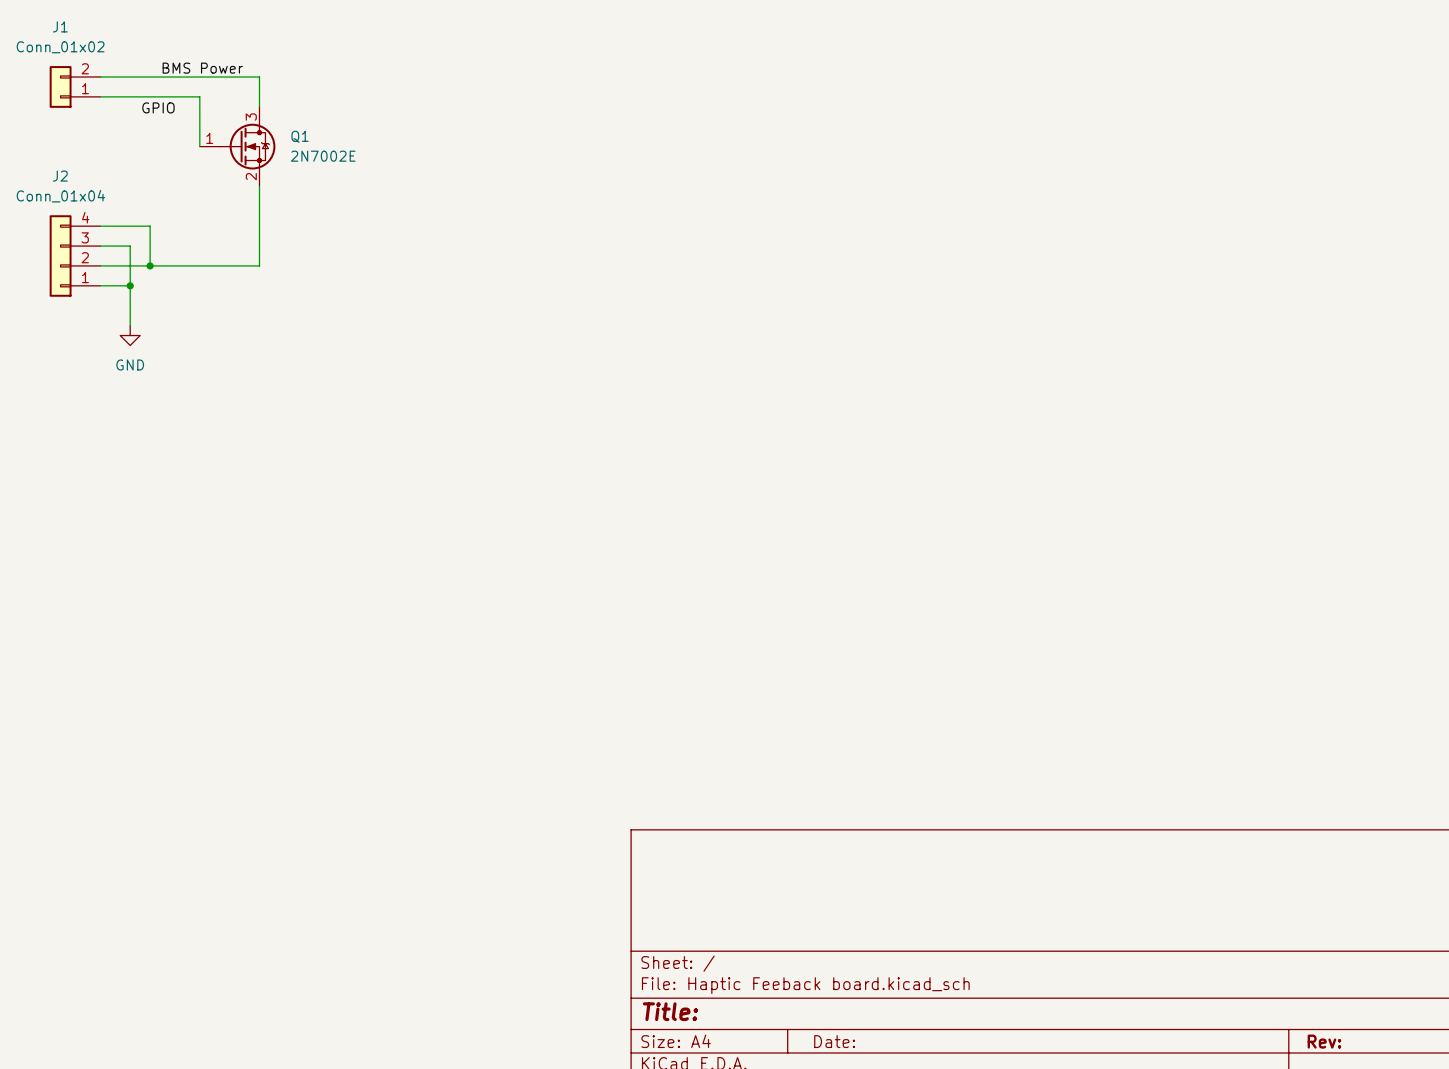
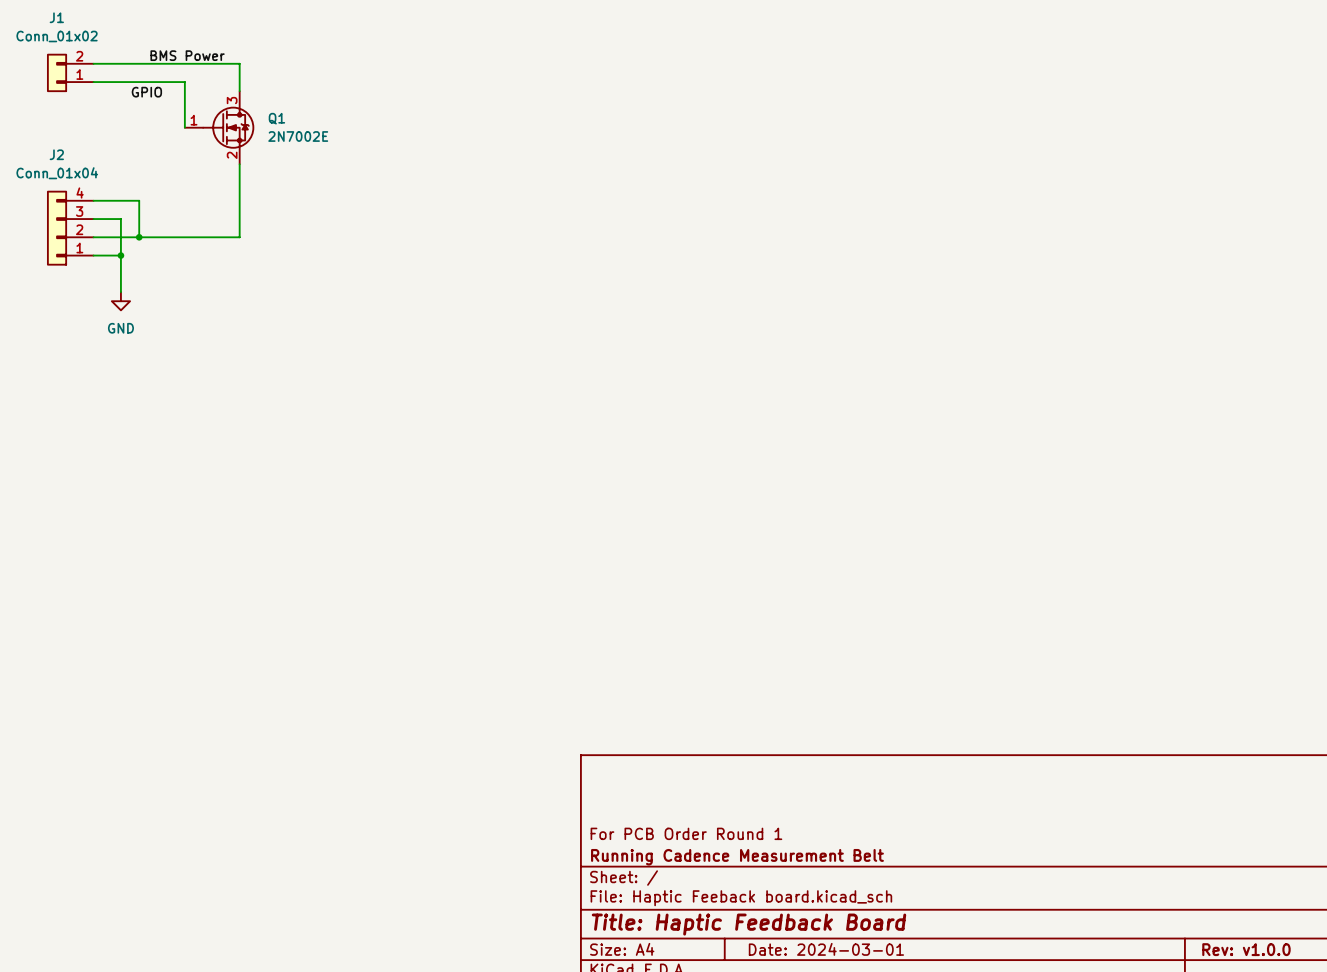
title block: none -> For PCB Order Round 1 (686, 833)
title block: none -> Running Cadence Measurement Belt (737, 857)
title block: Title: (670, 1011) -> Title: Haptic Feedback Board (748, 924)
title block: Date: (834, 1041) -> Date: 2024-03-01 (826, 949)
title block: Rev: (1324, 1041) -> Rev: v1.0.0 (1246, 949)

